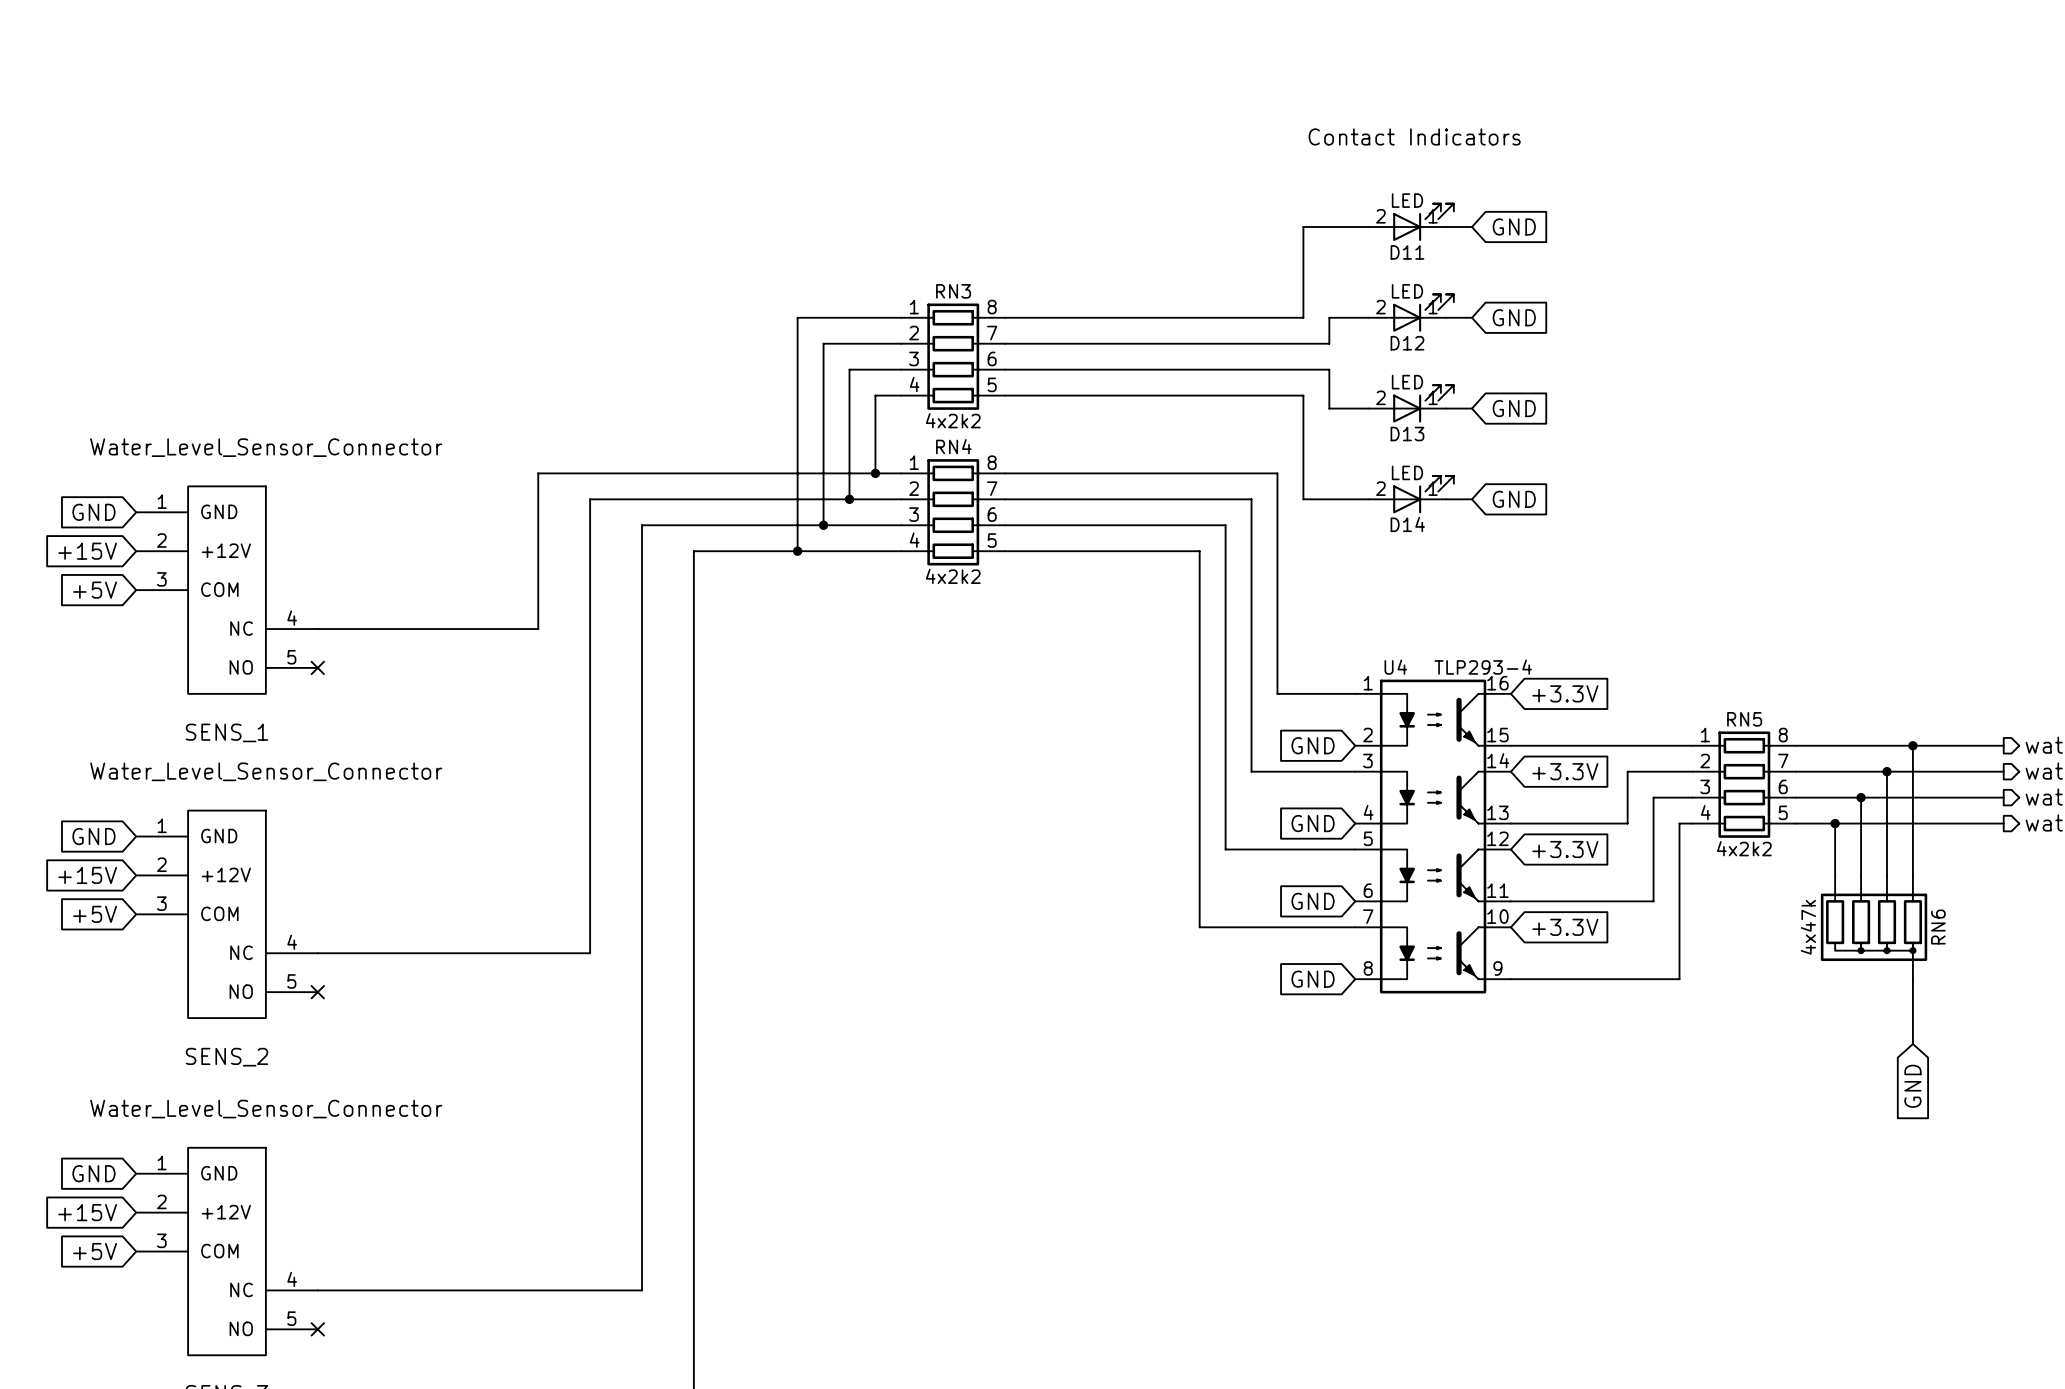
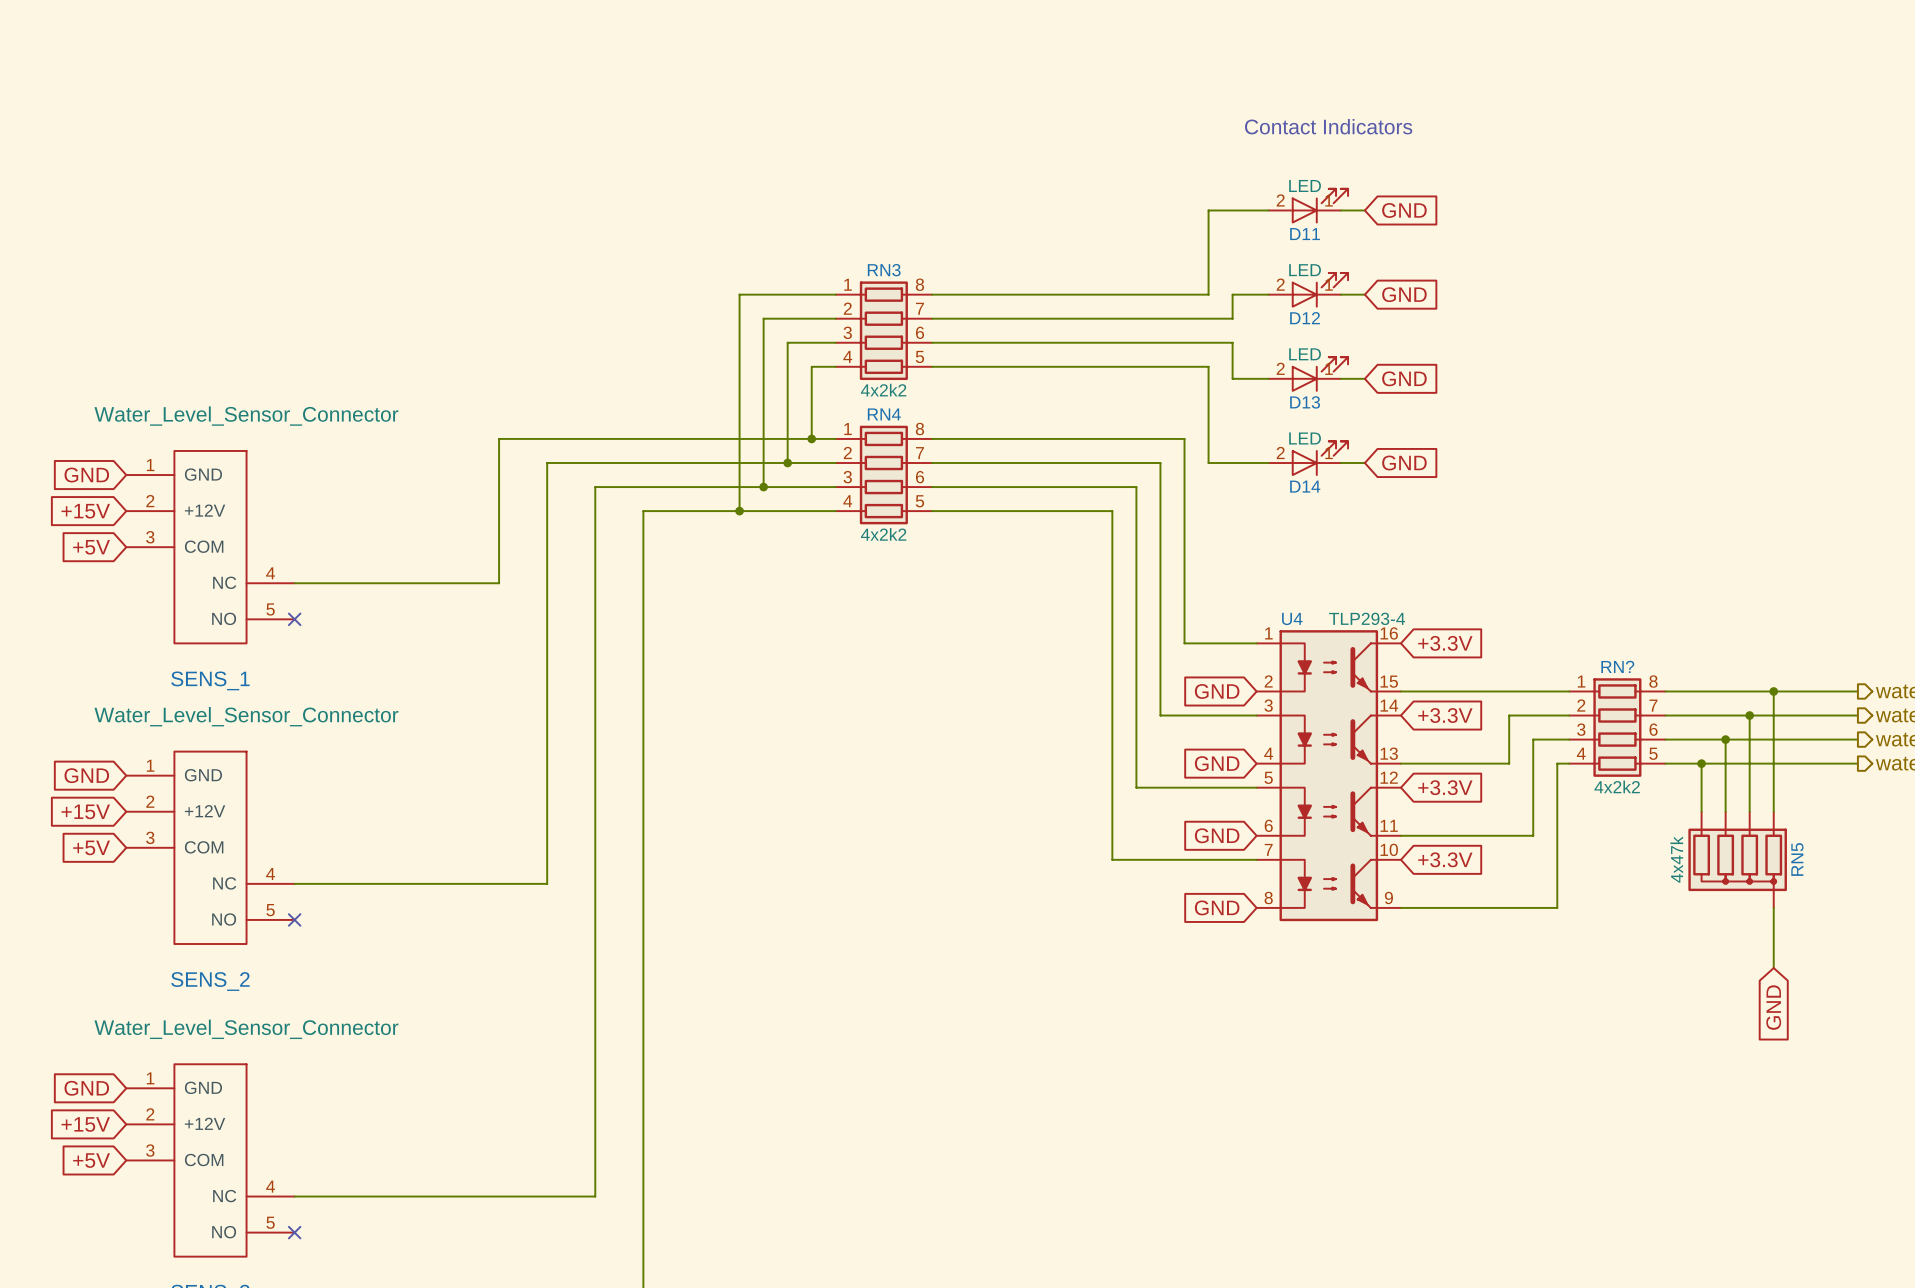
RN5 name: RN5 (1744, 719) -> RN? (1617, 666)
RN6 name: RN6 (1938, 927) -> RN5 (1797, 859)

